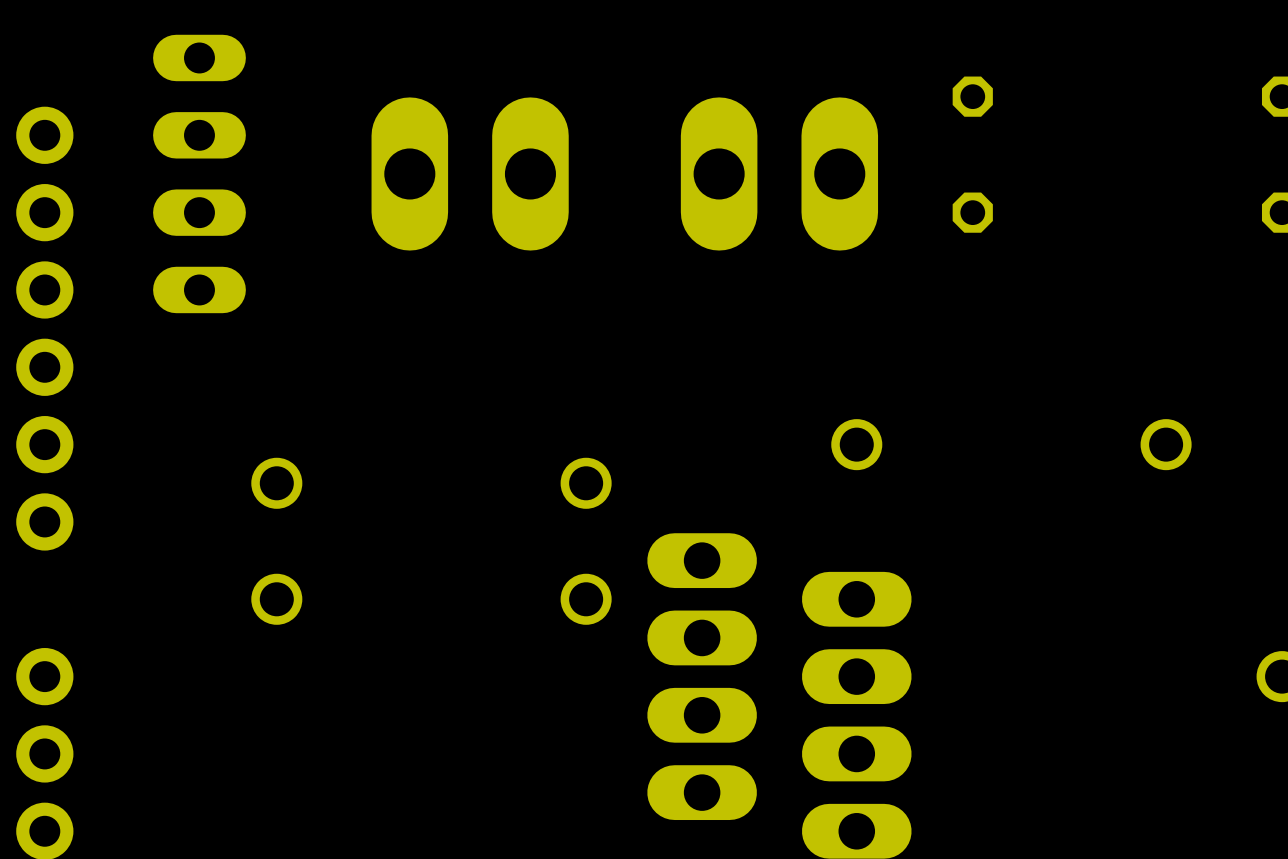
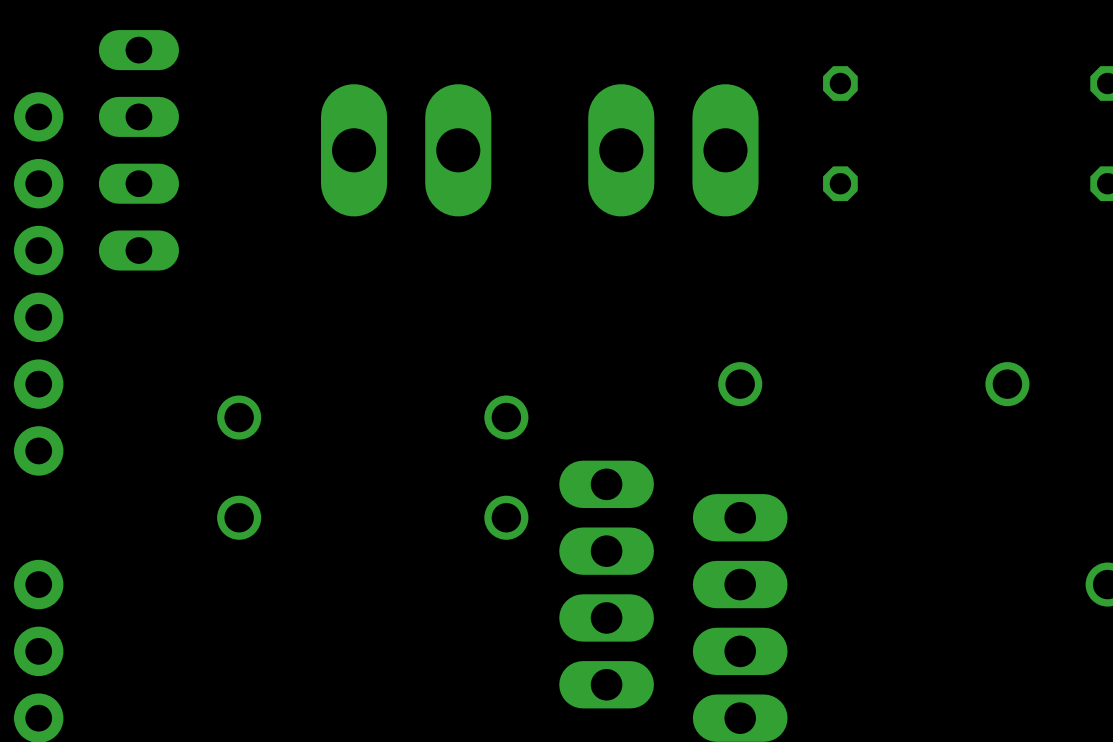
part position: (199, 173) -> (138, 150)

